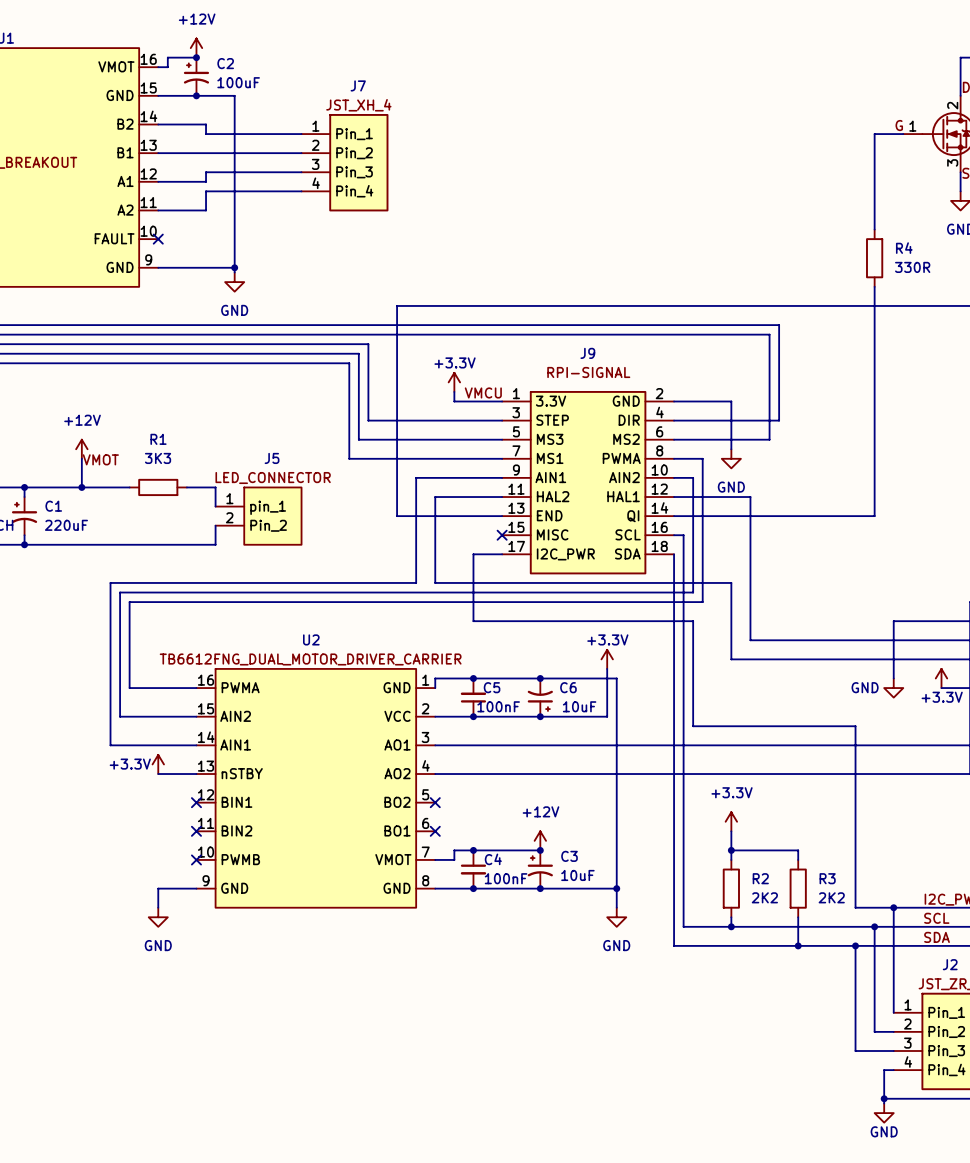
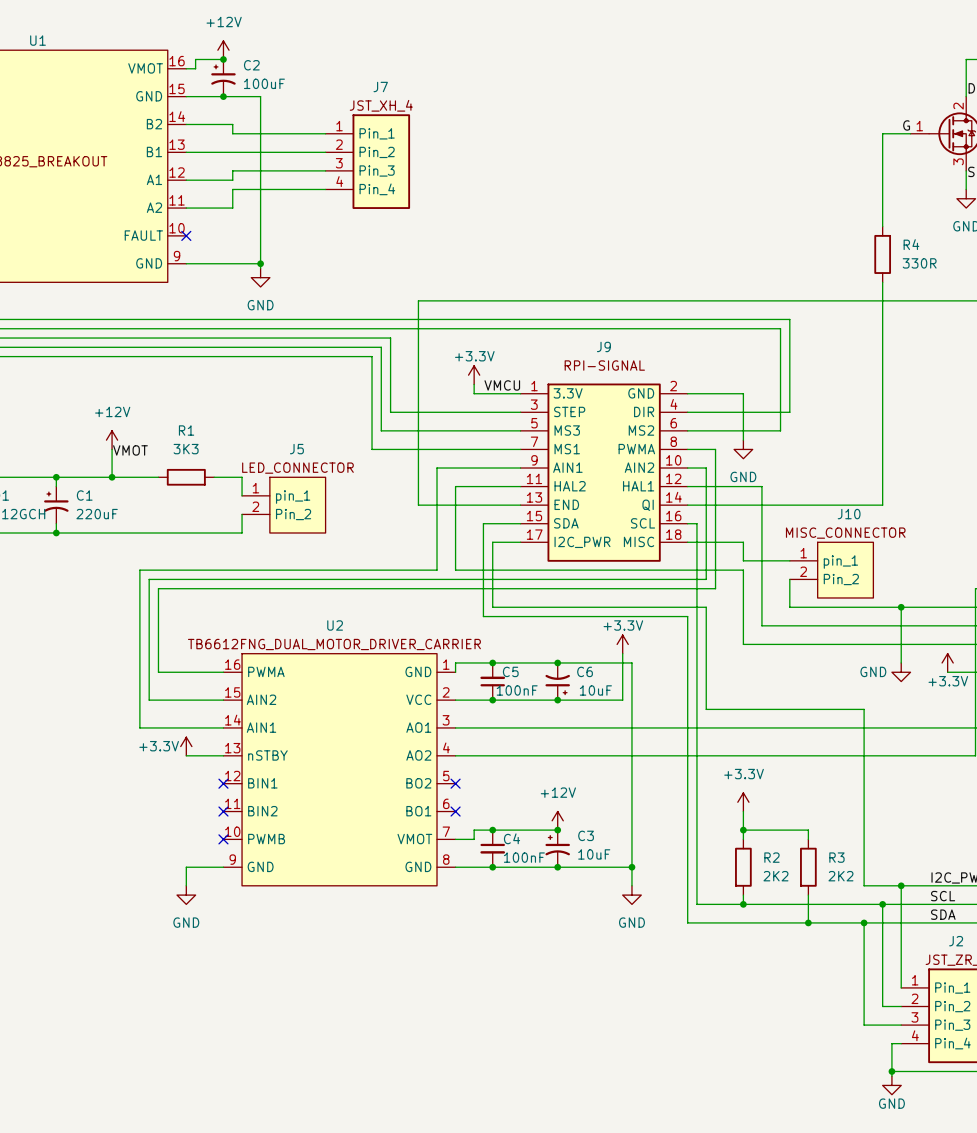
J9 pin name: MISC (552, 534) -> SDA (566, 523)
wire: none -> (520, 523) (483, 523) (483, 616) (687, 616)
no-connect mark: (502, 535) -> none
J9 pin name: SDA (627, 553) -> MISC (639, 541)
wire: (674, 554) (674, 630) -> (687, 542) (743, 542) (743, 560) (789, 560)
J10: none -> (831, 570)
wire: none -> (789, 579) (789, 607) (901, 607)
junction: none -> (901, 607)

